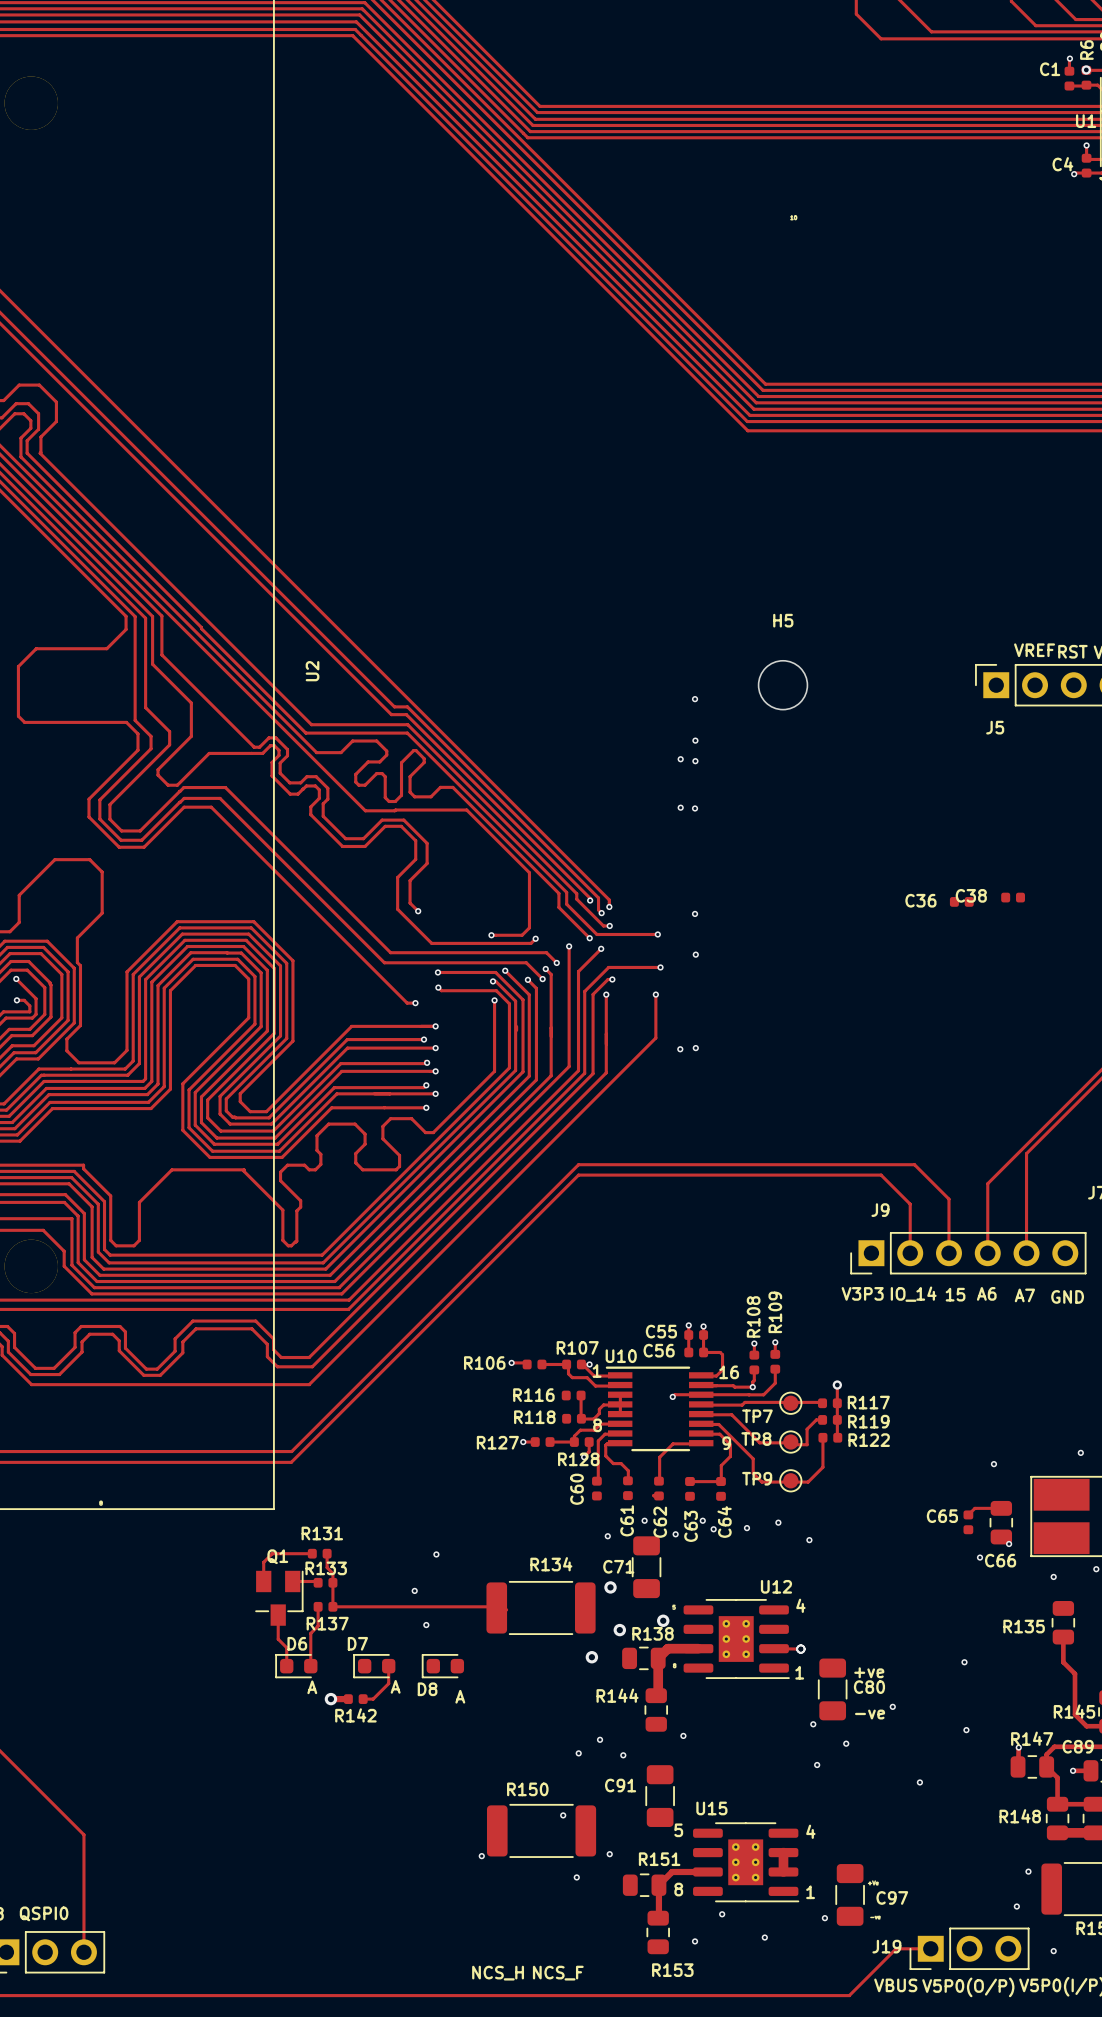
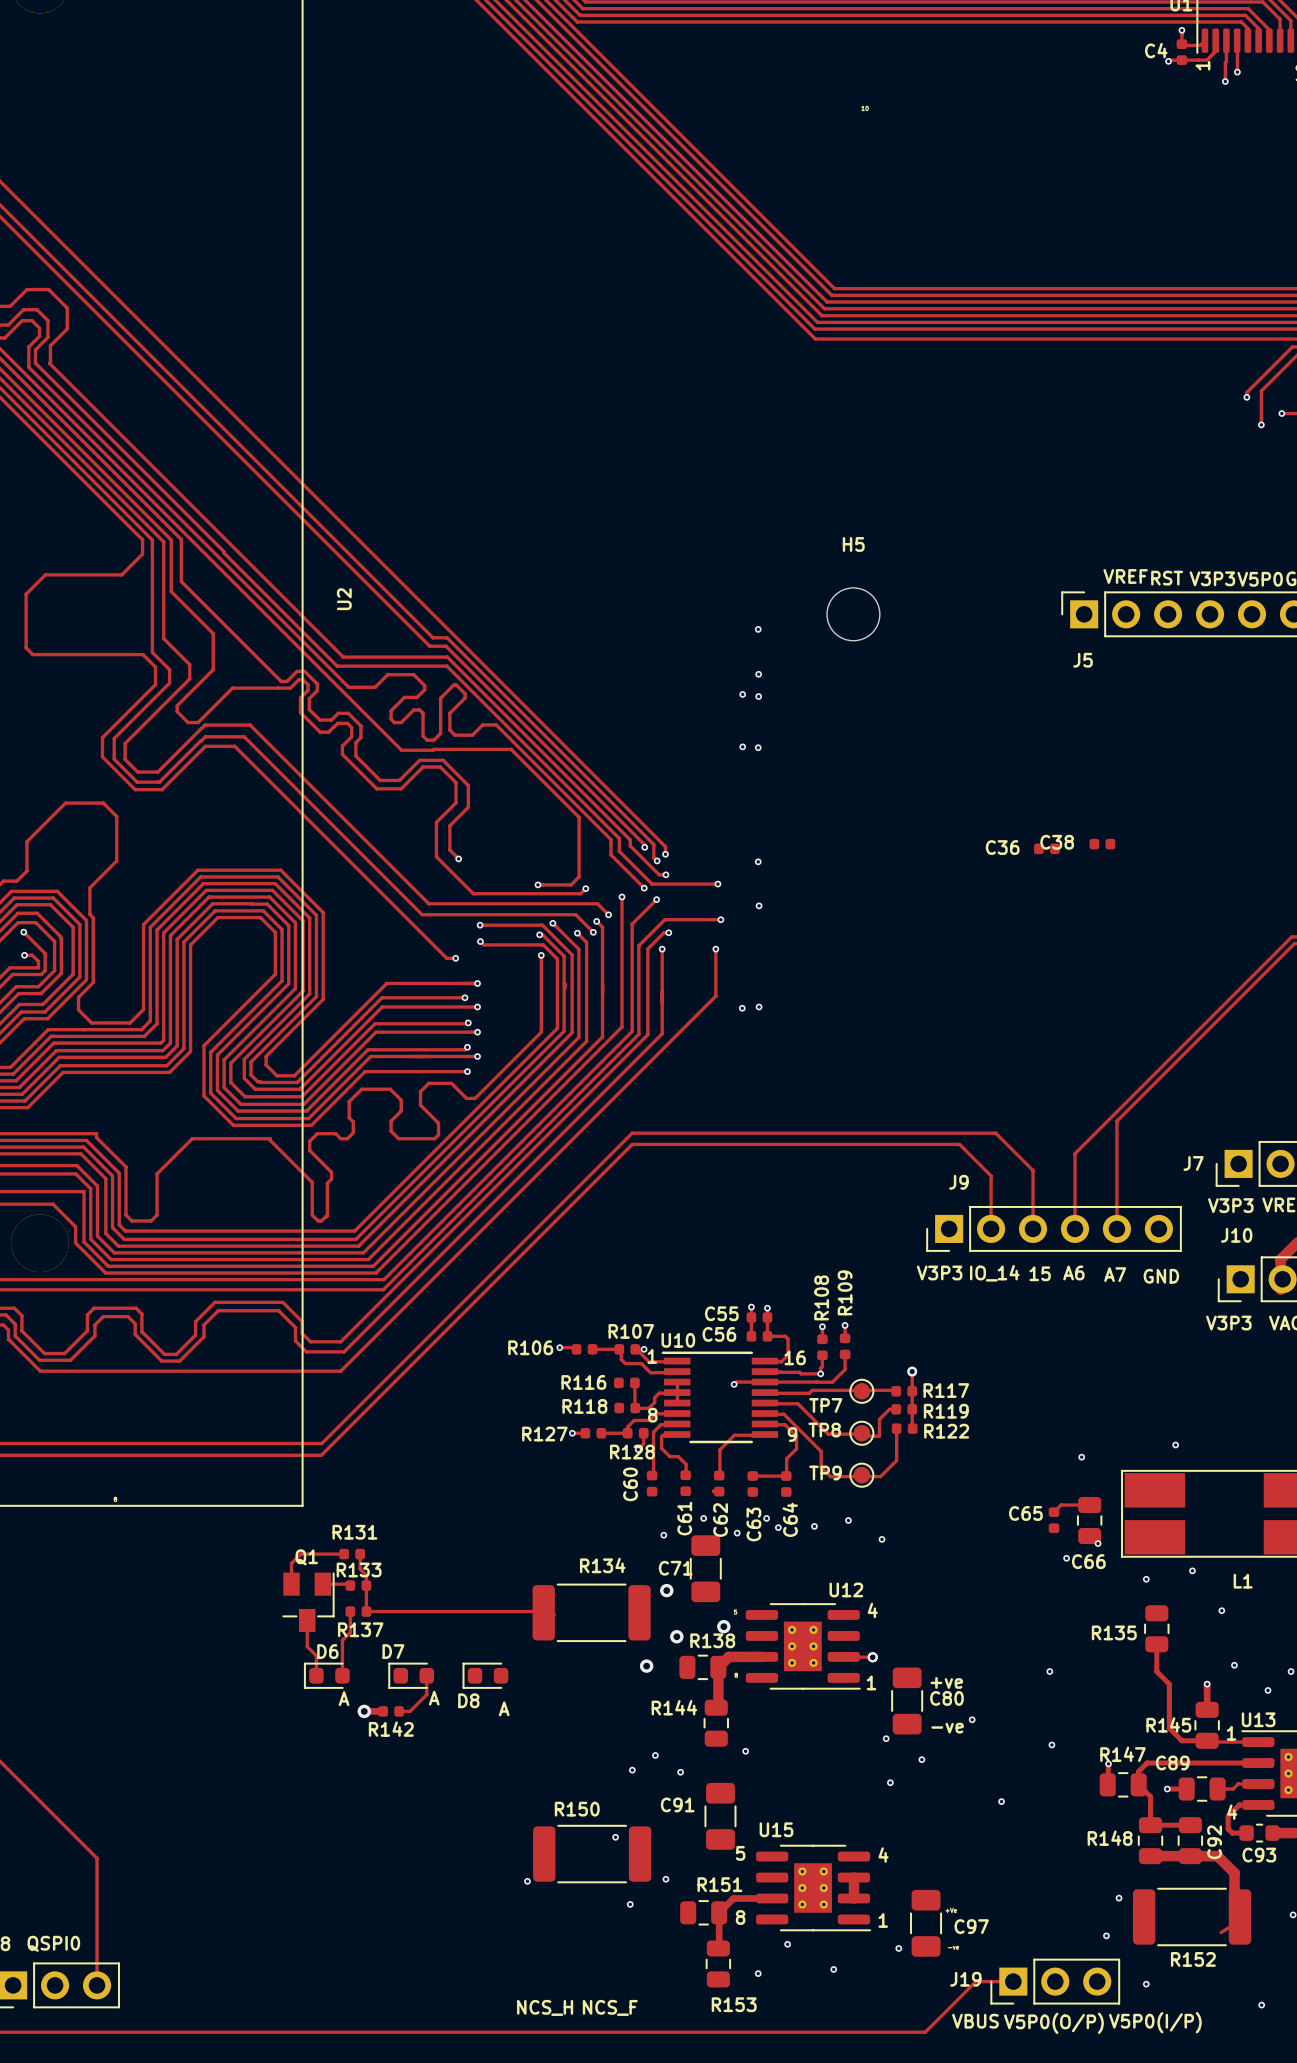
via: (436, 1554) -> none
via: (414, 1590) -> none
via: (426, 1625) -> none

